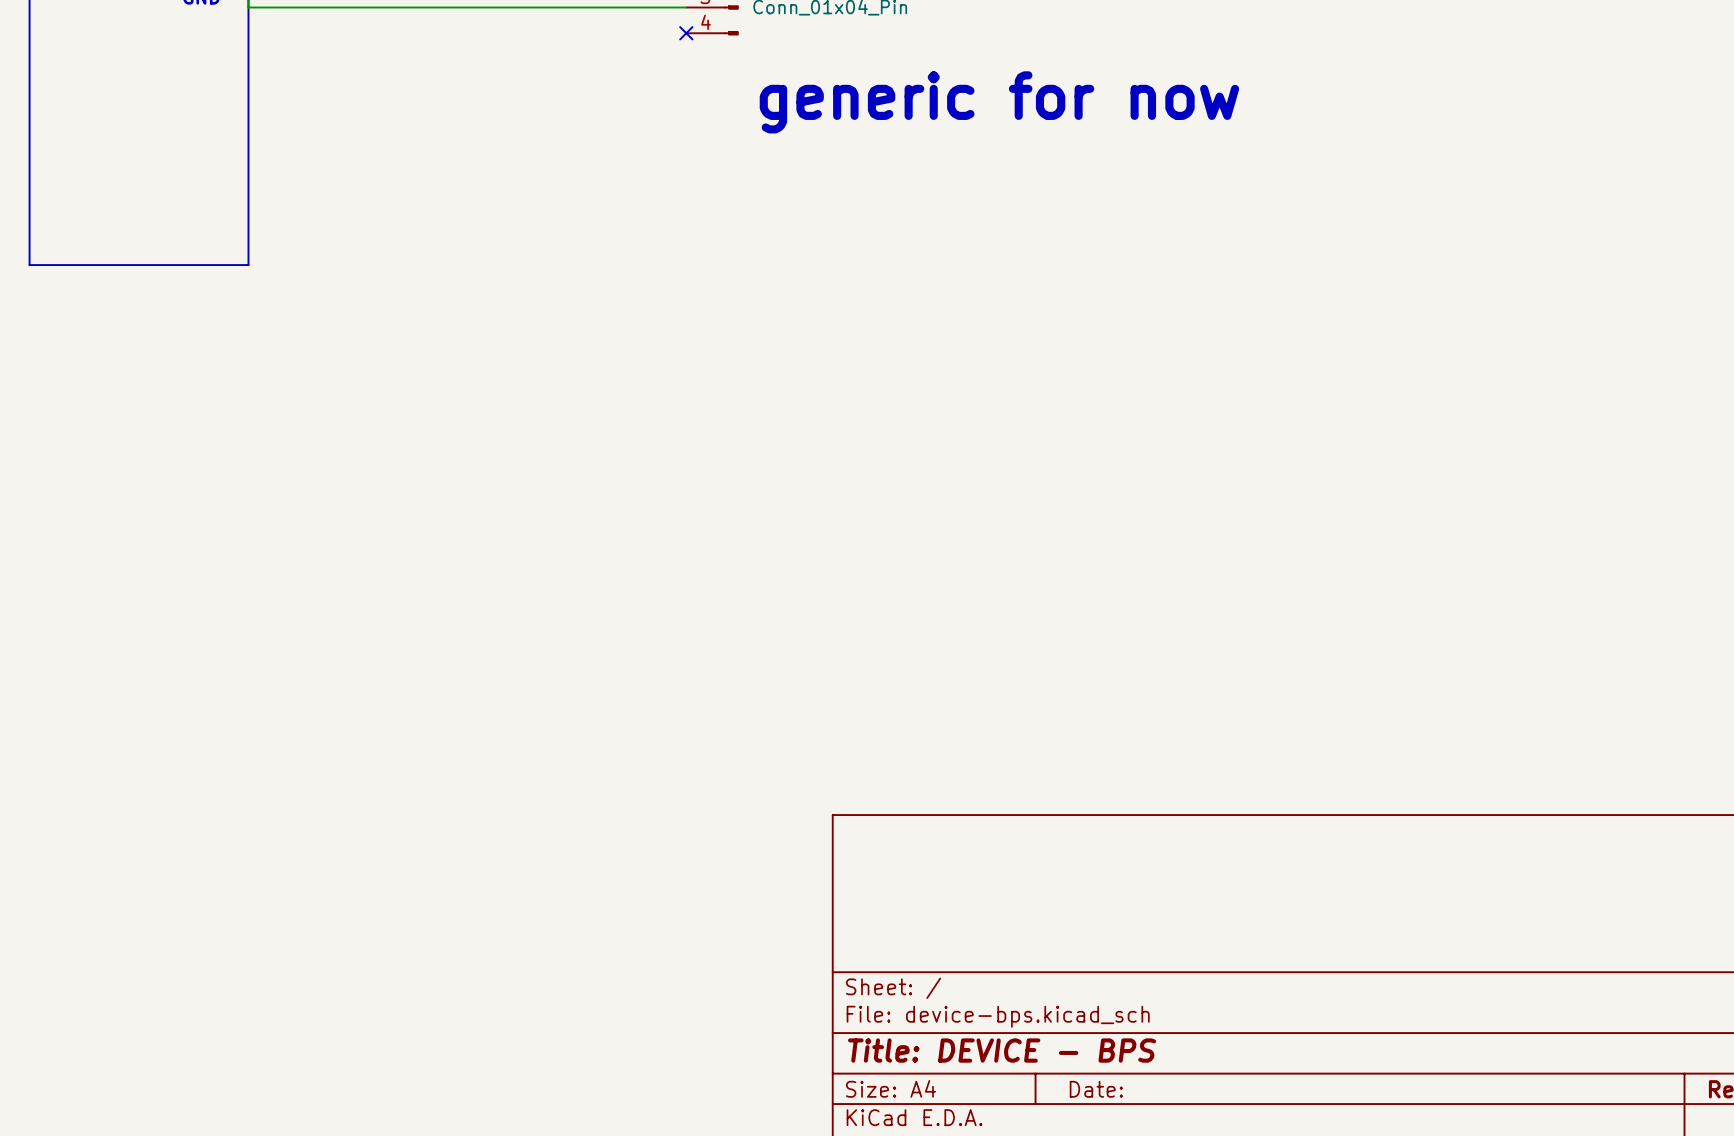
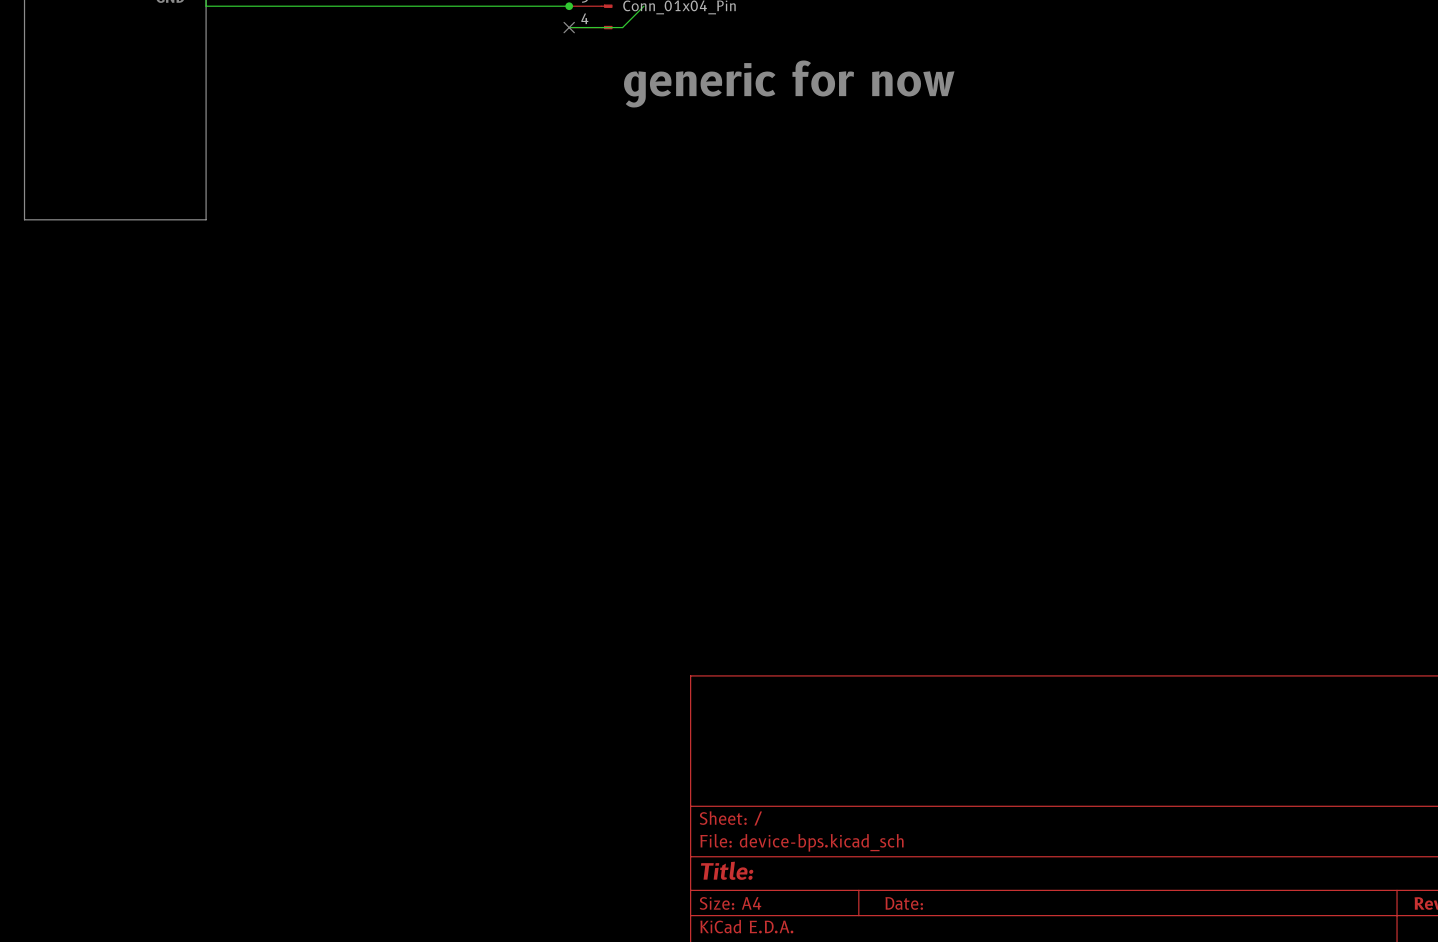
junction: none -> (569, 6)
wire: none -> (643, 6) (622, 27) (569, 27)
title block: Title: DEVICE - BPS (1002, 1050) -> Title: (727, 870)

